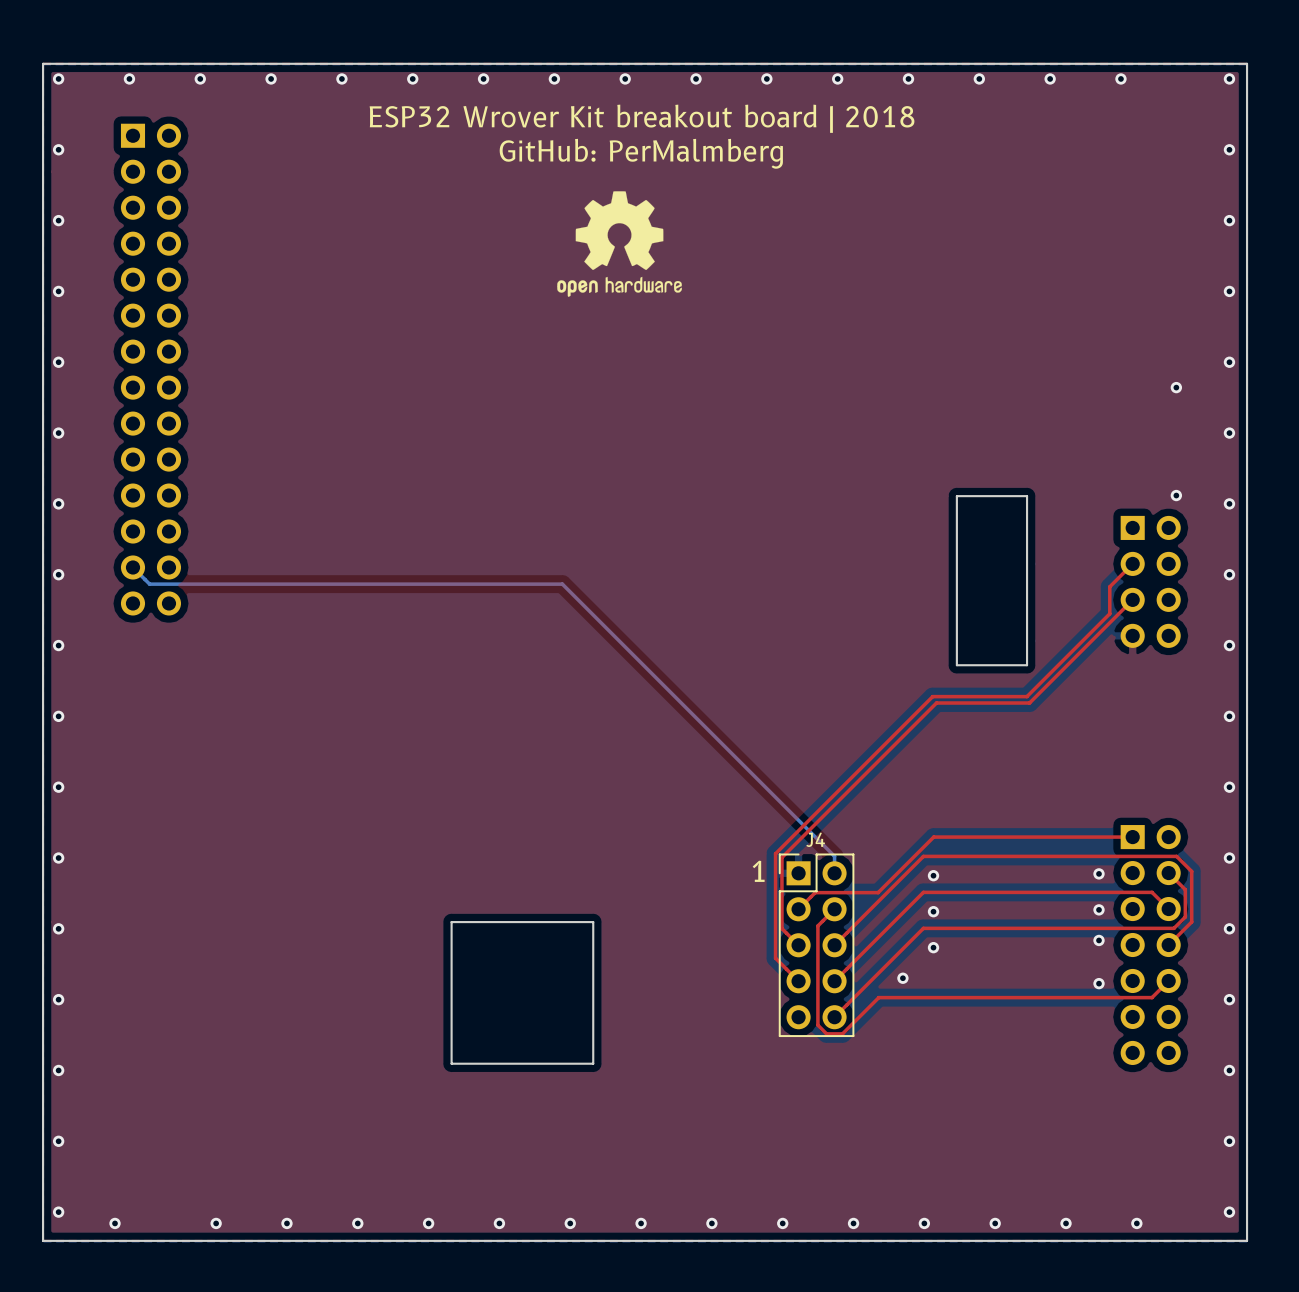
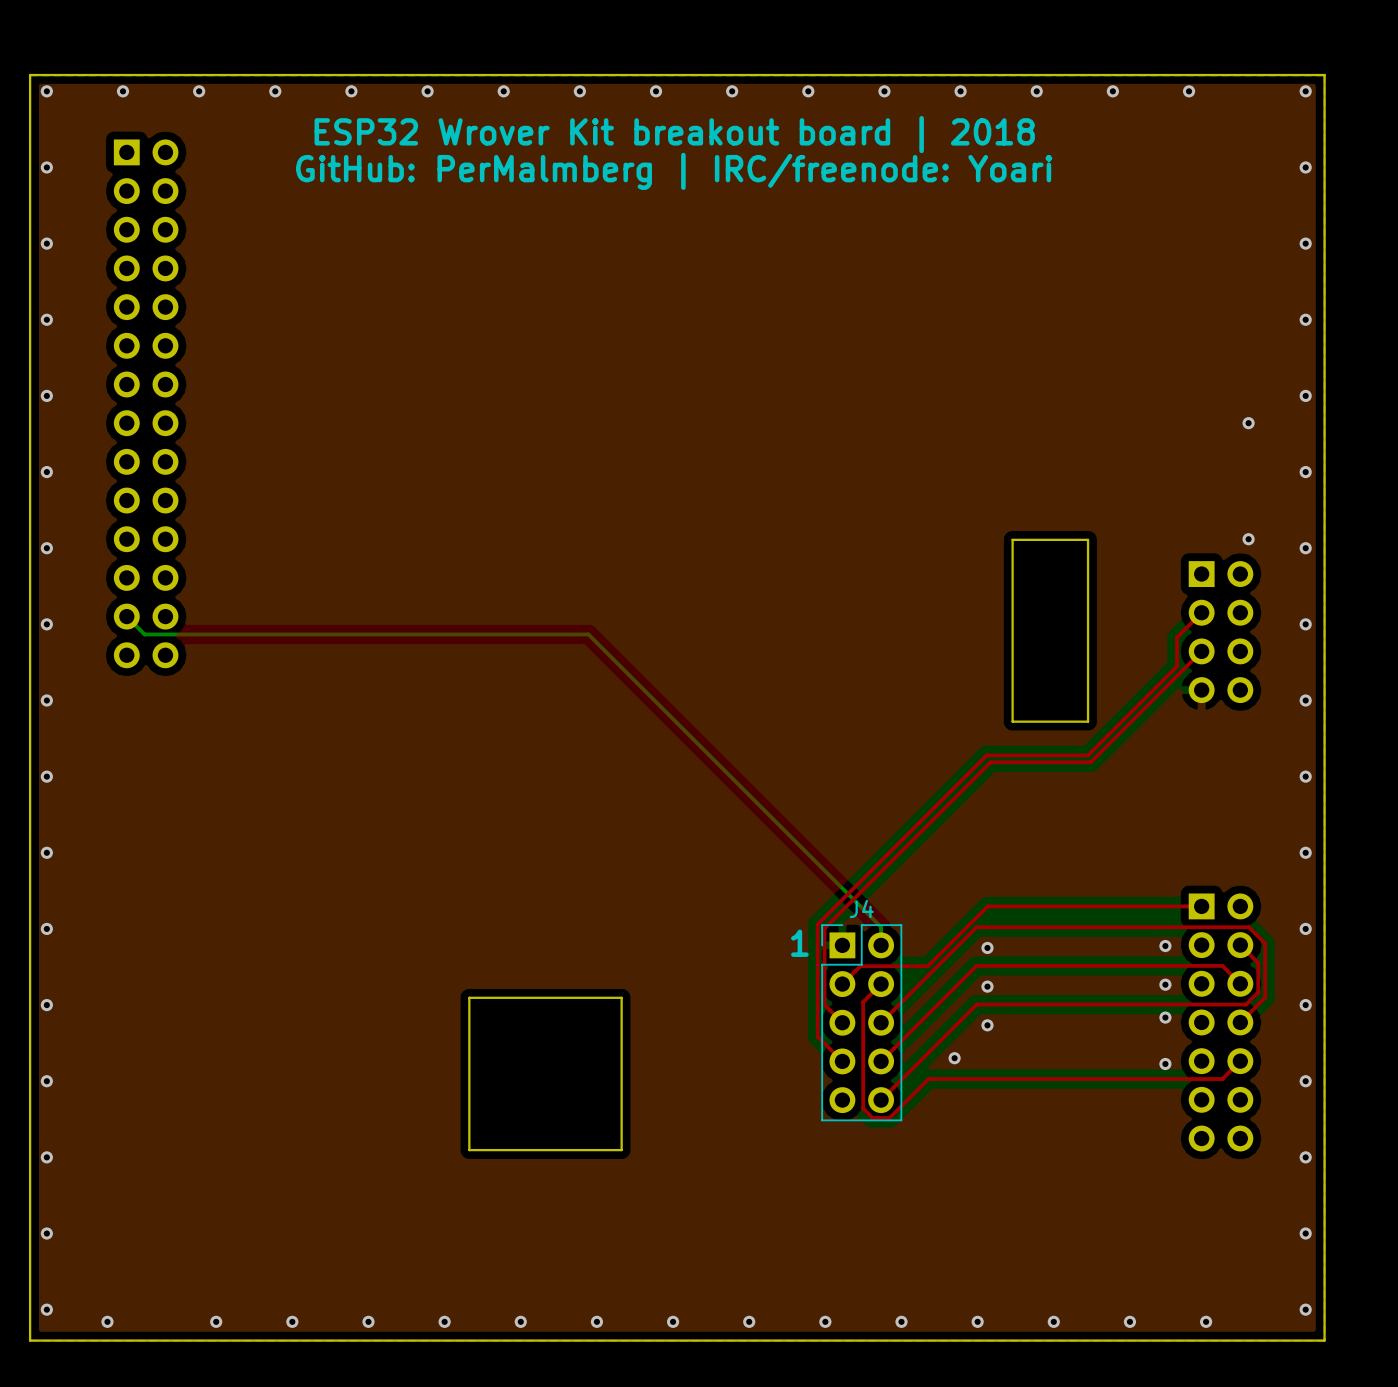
text: GitHub: PerMalmberg (641, 153) -> GitHub: PerMalmberg | IRC/freenode: Yoari (674, 171)
drawing: [557, 191, 682, 297] -> none

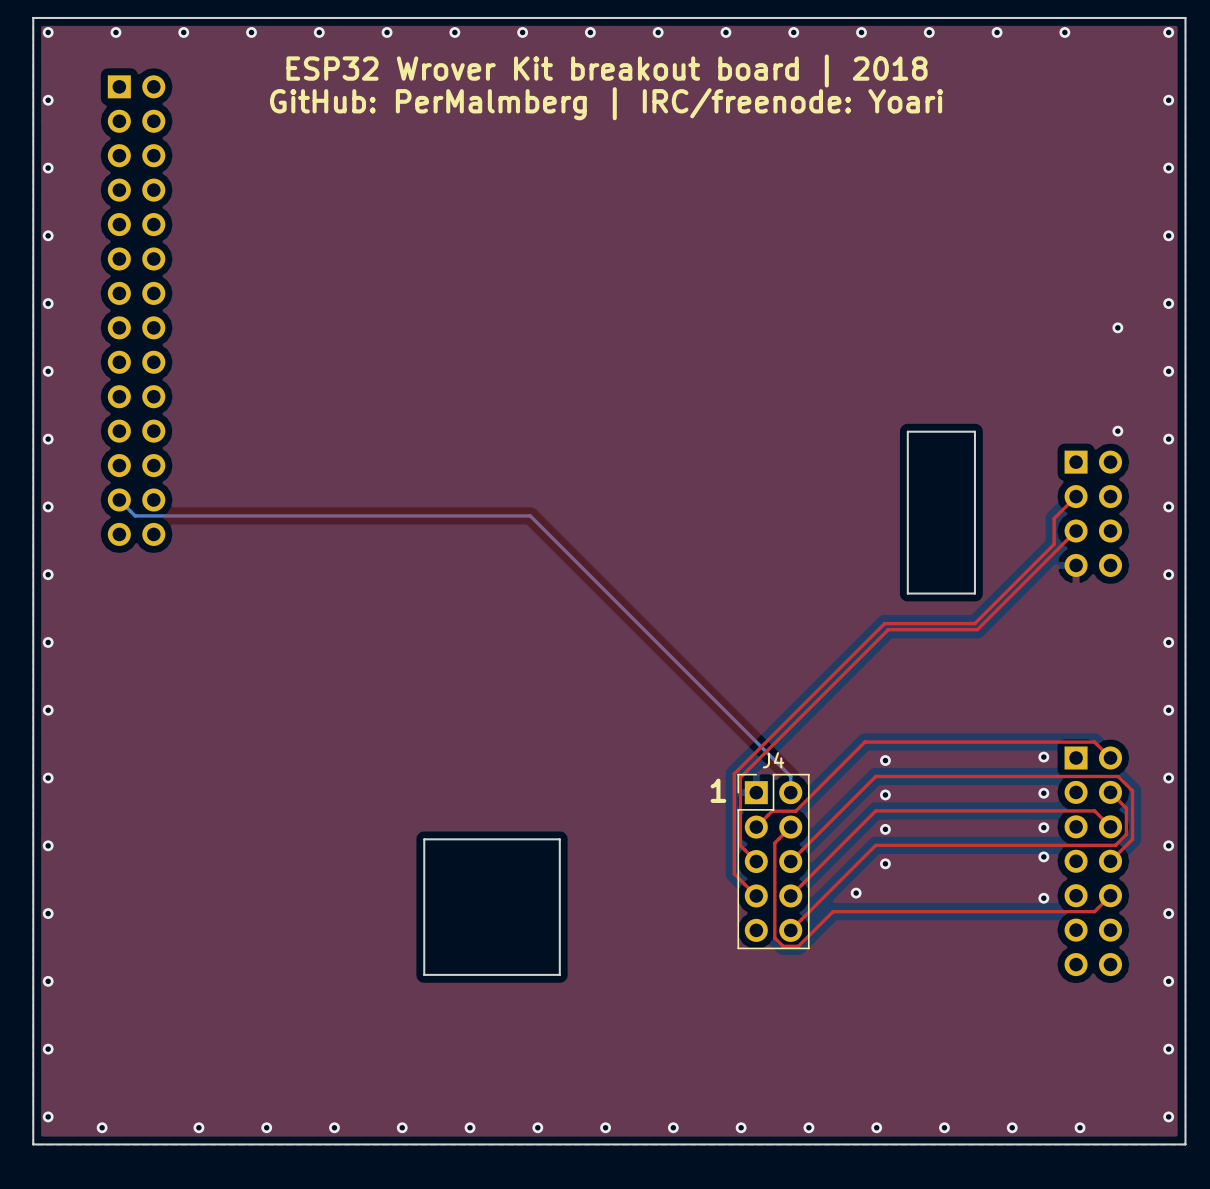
via: none -> (1043, 757)
top track: (1201, 906) (987, 906) (927, 966) (886, 966) -> (1110, 757) (1094, 742) (864, 742) (795, 811)
via: none -> (885, 760)

